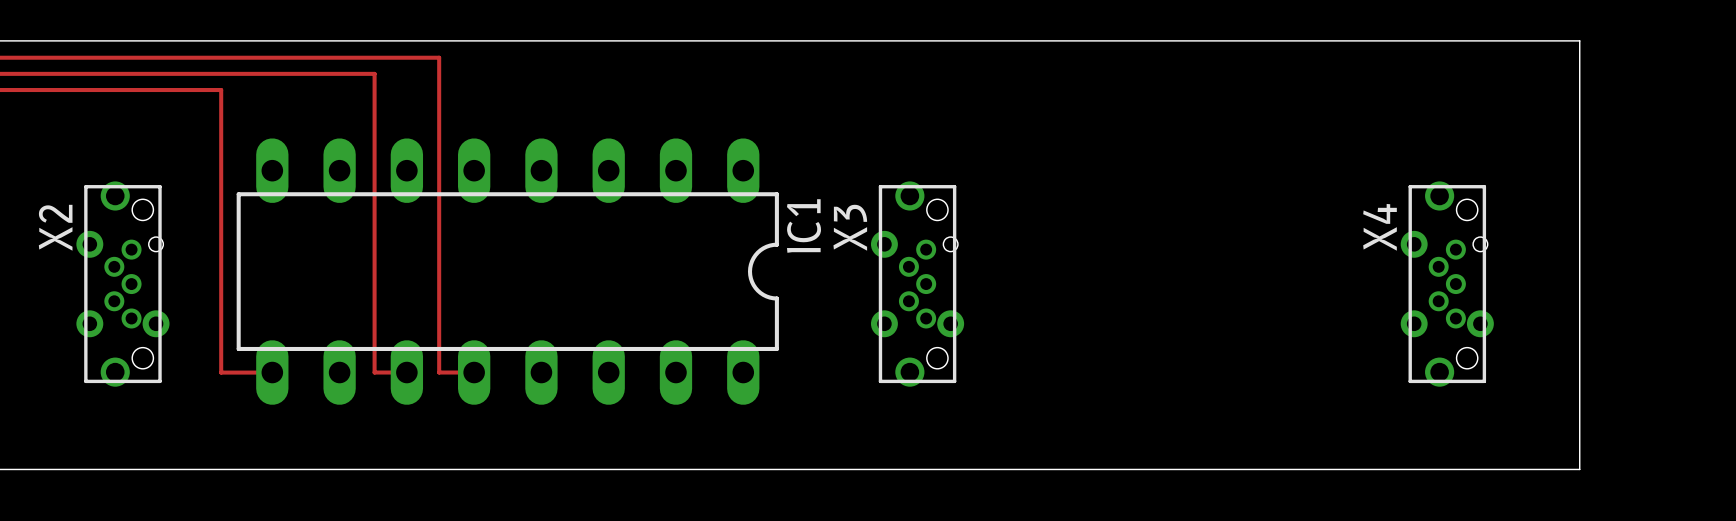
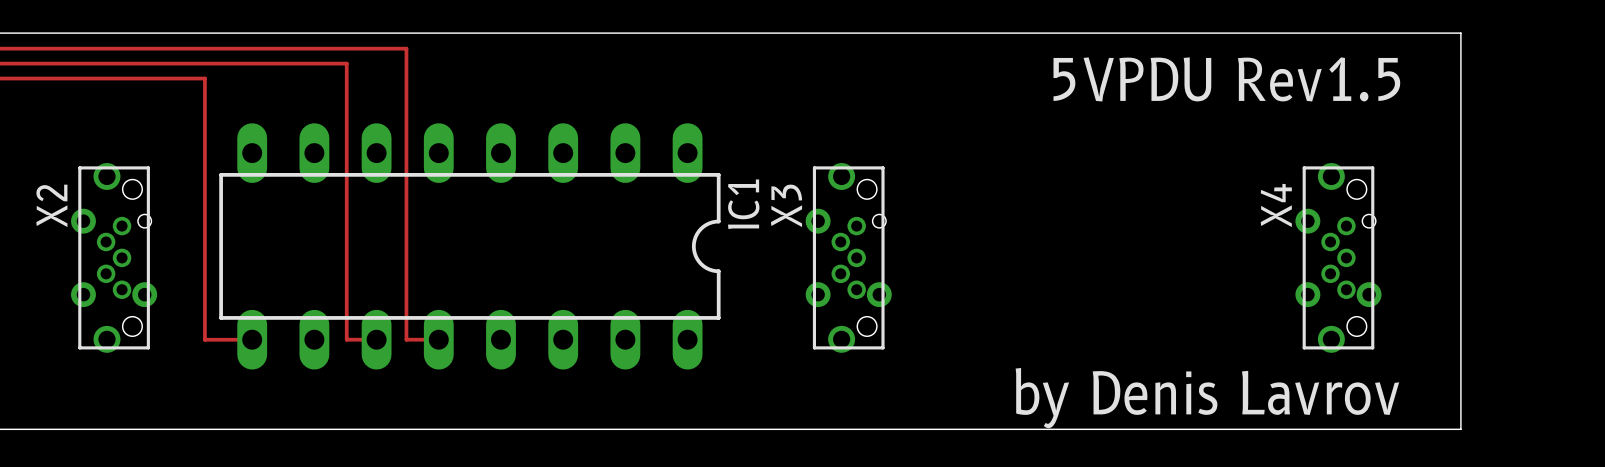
text: none -> 5VPDU Rev1.5 (1226, 79)
text: none -> by Denis Lavrov (1207, 398)

